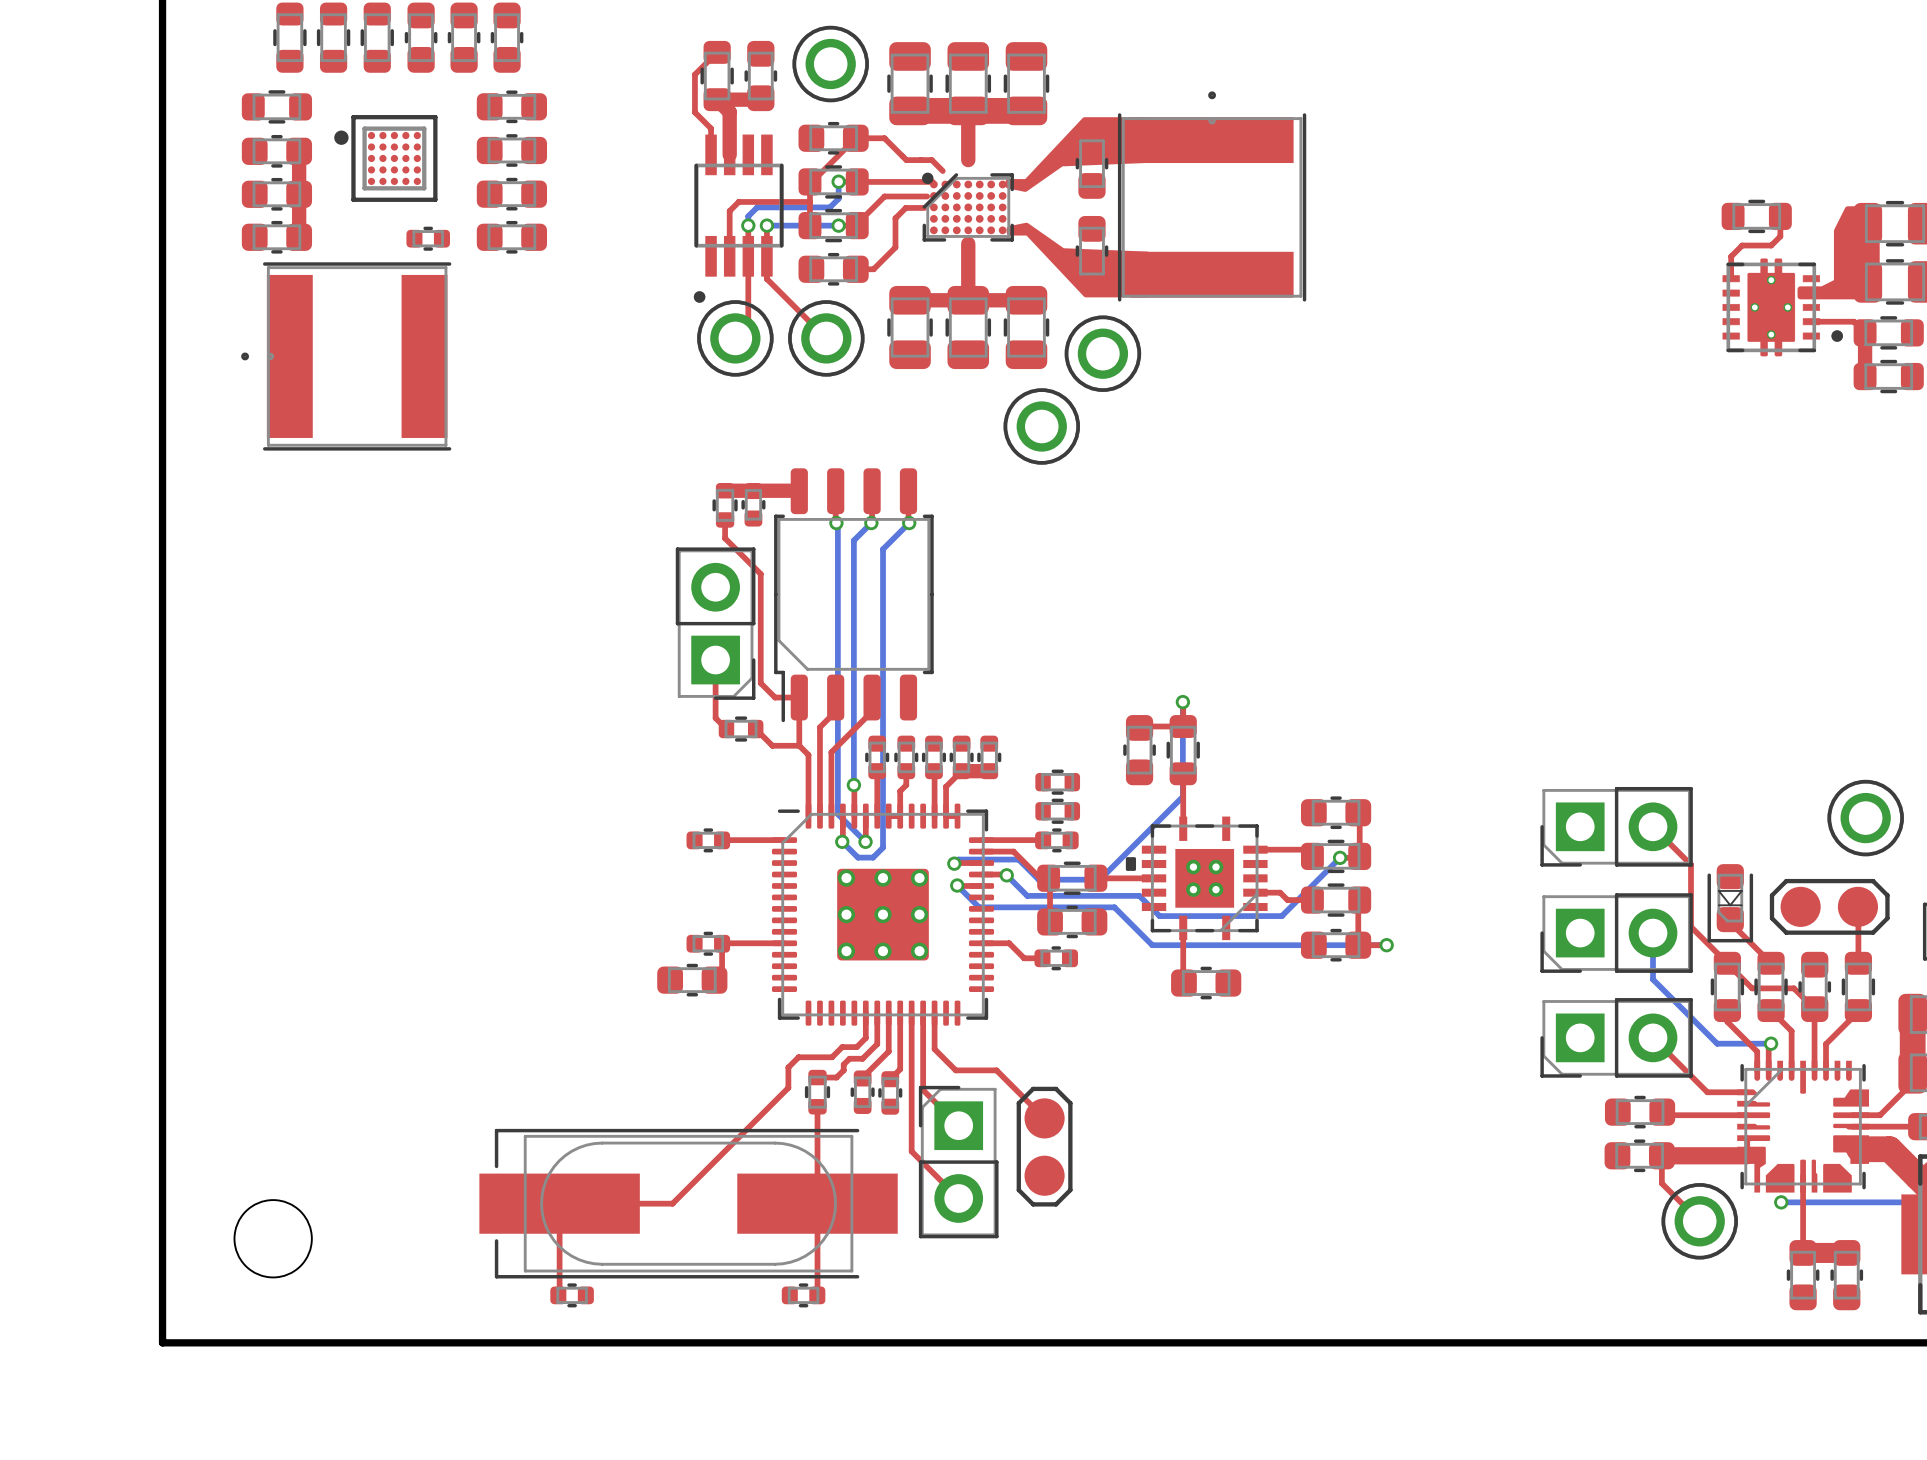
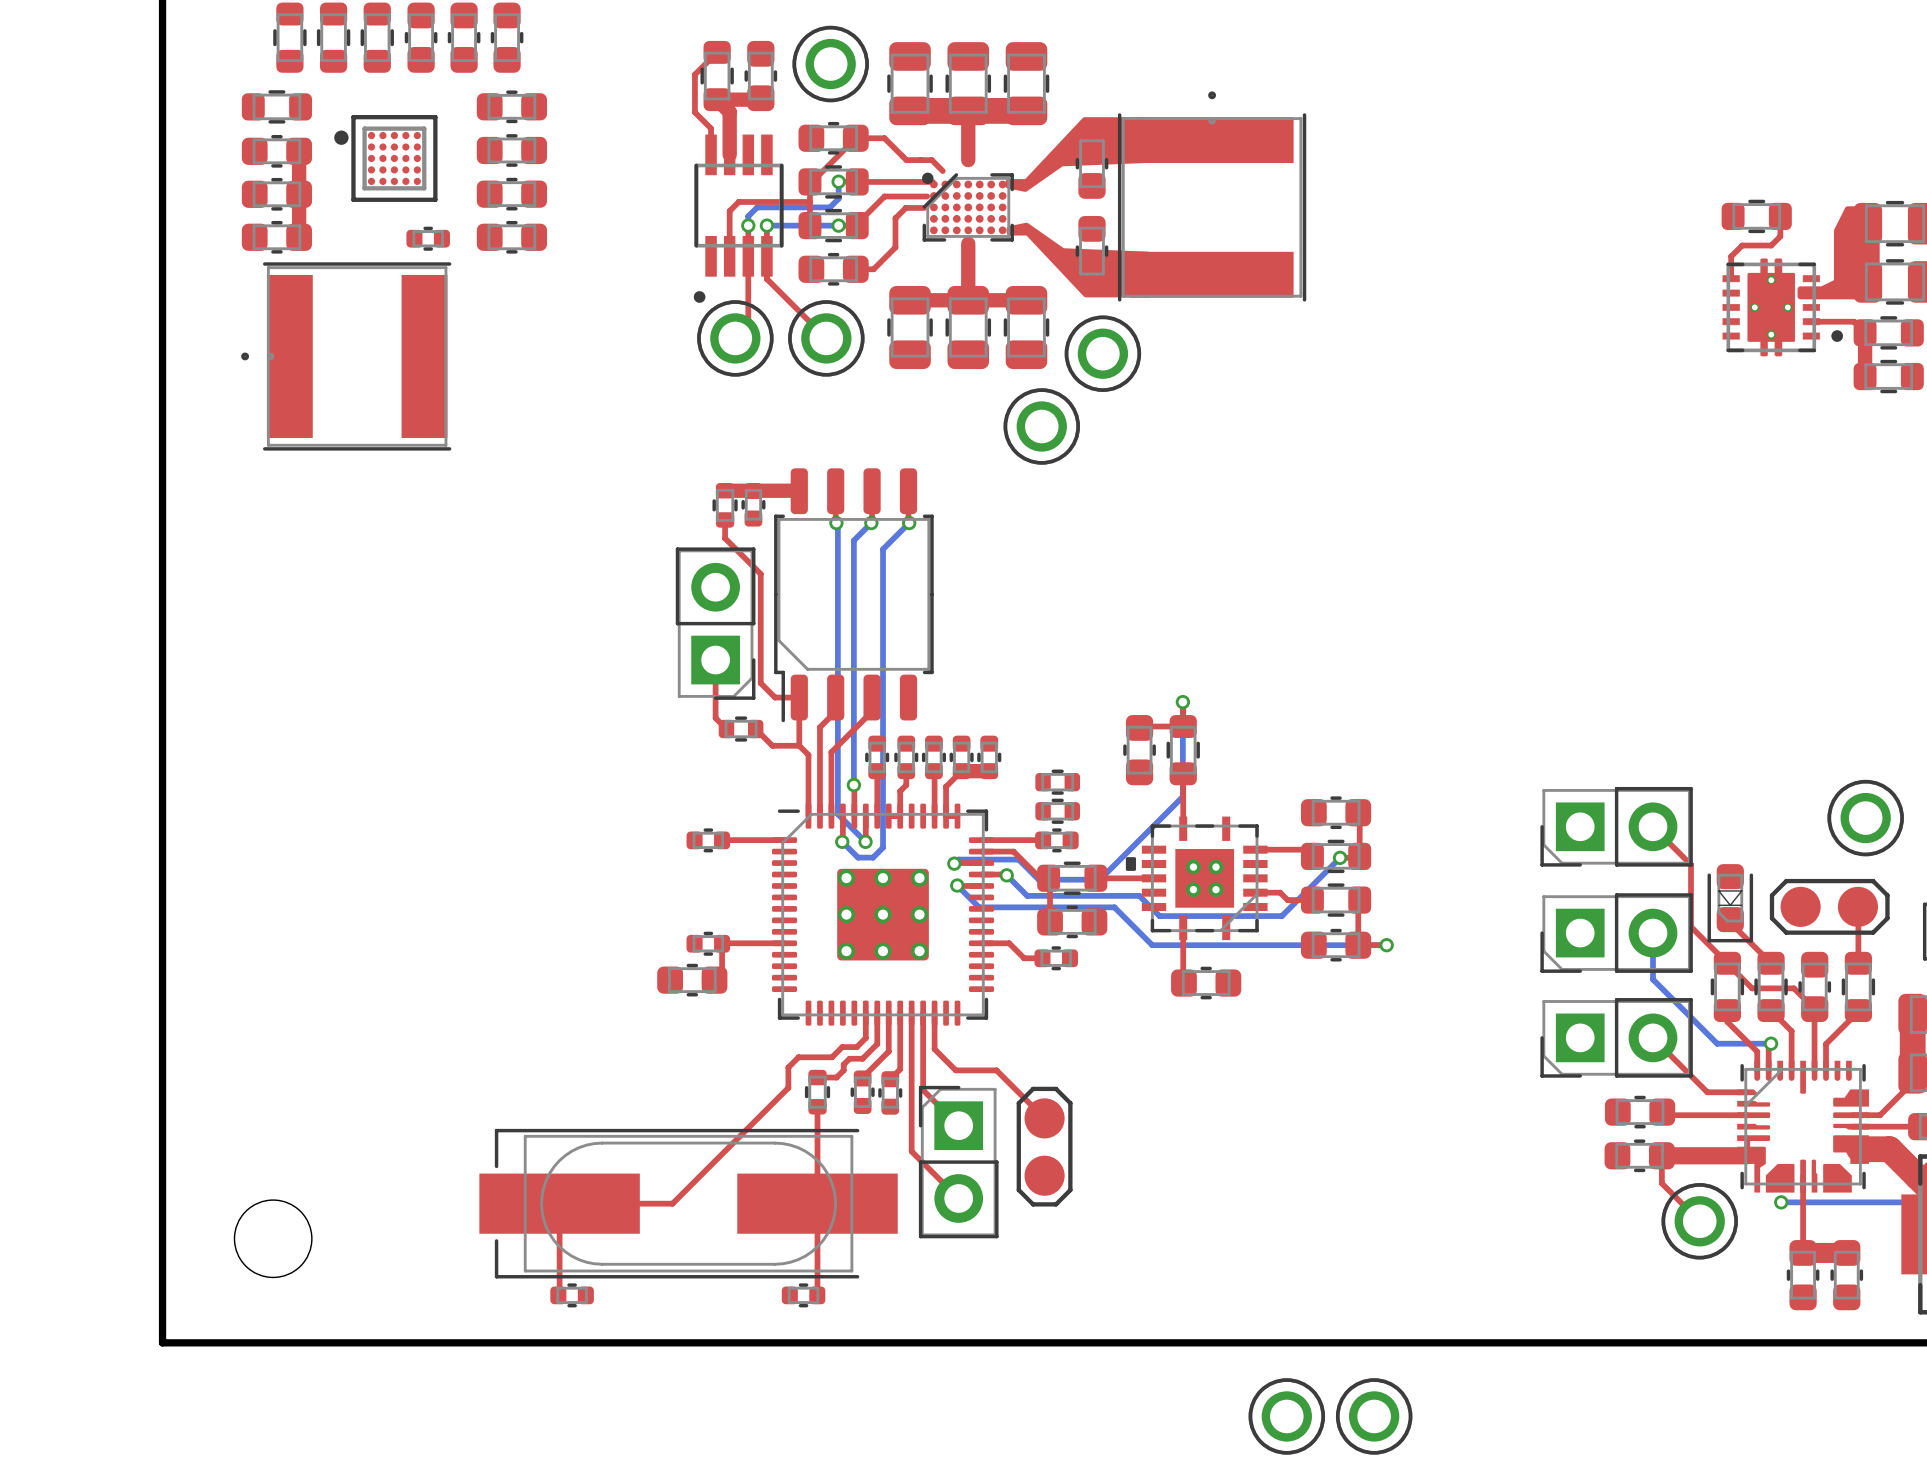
part: none -> (1286, 1416)
part: none -> (1374, 1416)

